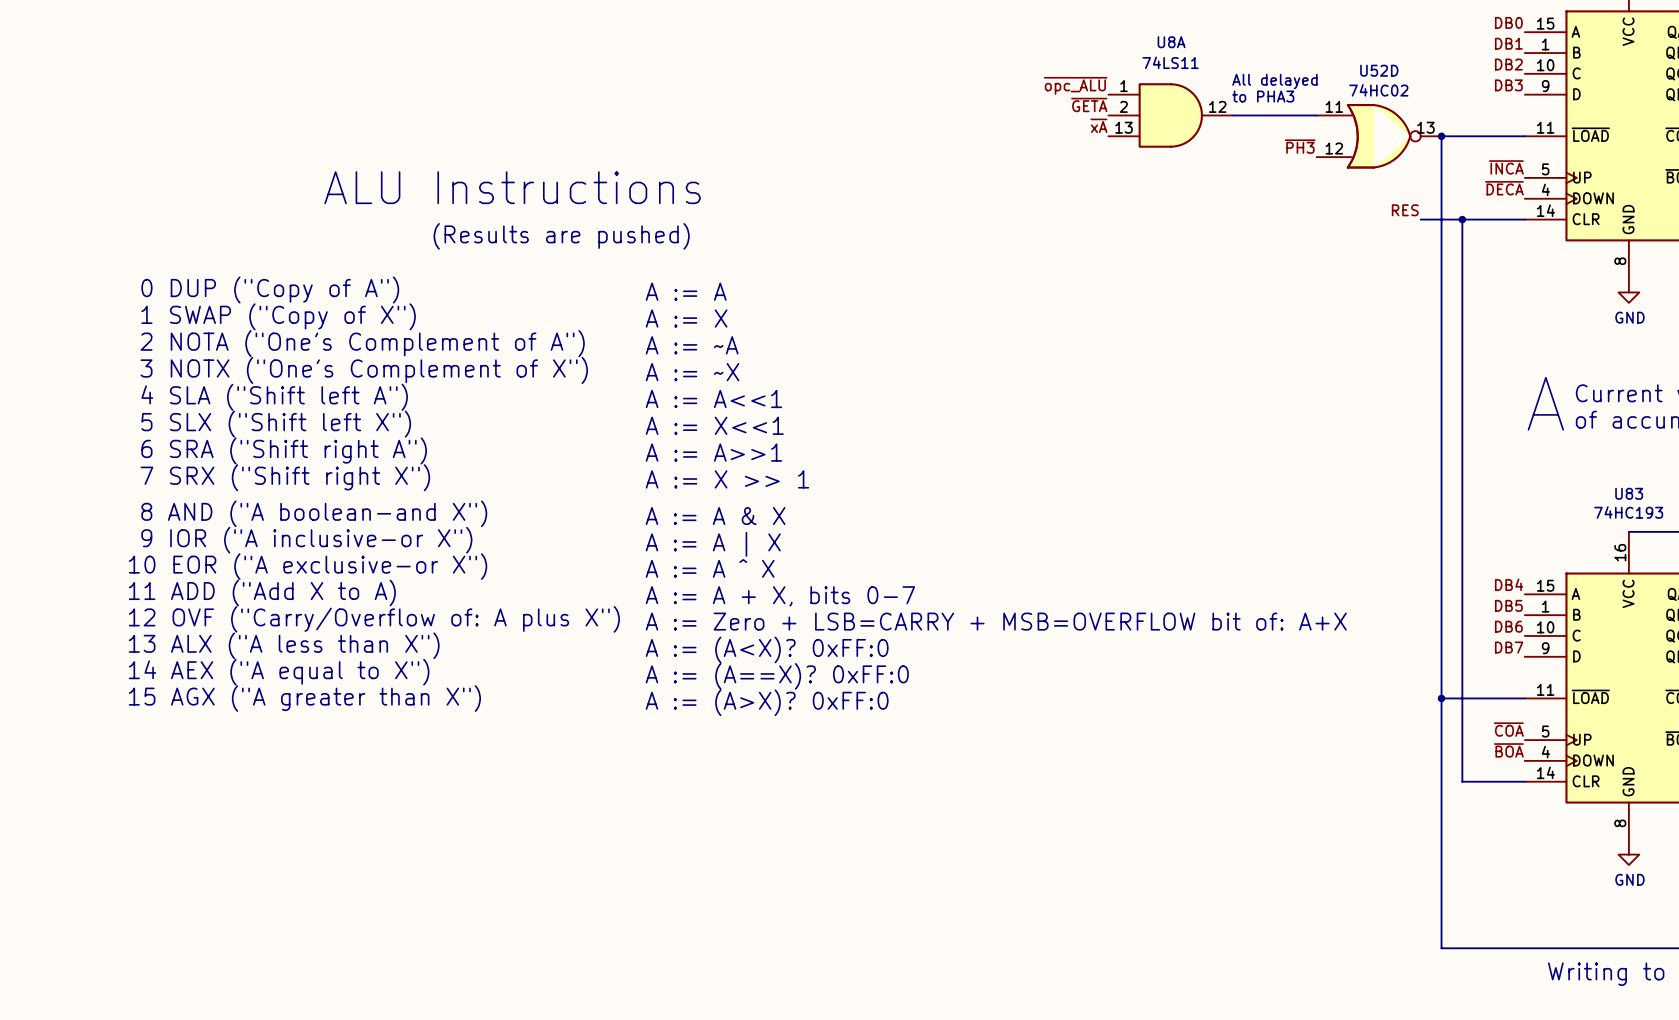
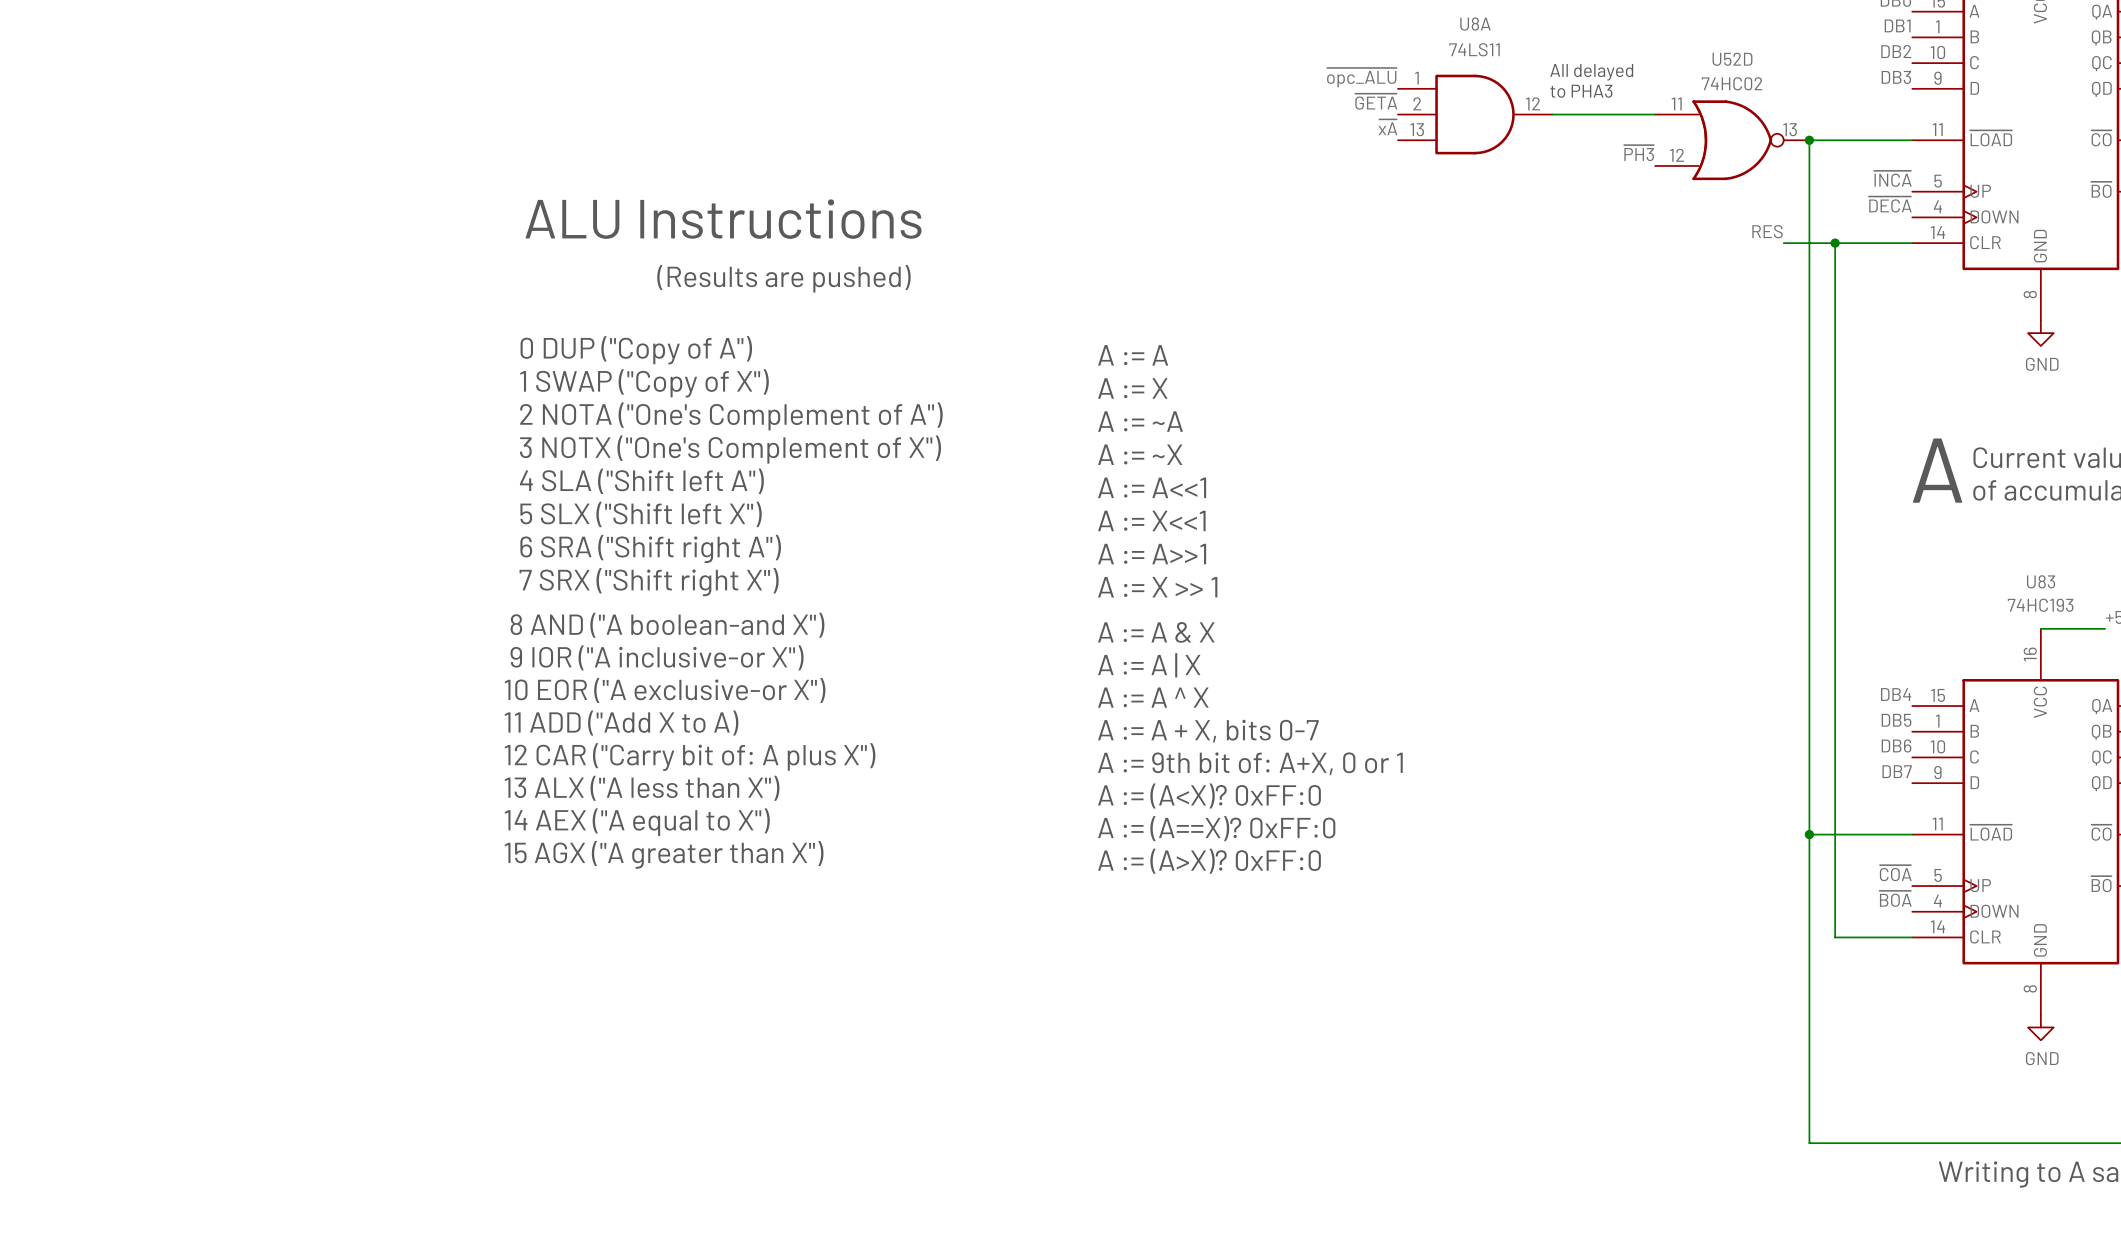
text position: ALU Instructions (512, 187) -> ALU Instructions (723, 219)
text position: (Results are pushed) (561, 236) -> (Results are pushed) (783, 278)
text: 0 DUP ("Copy of A") (270, 290) -> none
text: A := A (686, 291) -> none
text: none -> 0 DUP ("Copy of A") (636, 350)
text: none -> A := A (1133, 355)
text: 1 SWAP ("Copy of X") (278, 316) -> none
text: A := X (686, 318) -> none
text: none -> 1 SWAP ("Copy of X") (644, 383)
text: none -> A := X (1132, 388)
text: 2 NOTA ("One's Complement of A") (362, 343) -> none
text: A := ~A (692, 345) -> none
text: none -> 2 NOTA ("One's Complement of A") (731, 416)
text: none -> A := ~A (1140, 421)
text: 3 NOTX ("One's Complement of X") (364, 370) -> none
text: A := ~X (692, 372) -> none
text: none -> 3 NOTX ("One's Complement of X") (730, 449)
text: none -> A := ~X (1140, 454)
text: 4 SLA ("Shift left A") (274, 397) -> none
text: A := A<<1 (713, 398) -> none
text: none -> 4 SLA ("Shift left A") (641, 481)
text: none -> A := A<<1 (1152, 487)
text: 5 SLX ("Shift left X") (276, 424) -> none
text: A := X<<1 (714, 425) -> none
text: none -> 5 SLX ("Shift left X") (641, 514)
text: none -> A := X<<1 (1151, 520)
text: 6 SRA ("Shift right A") (284, 450) -> none
text: A := A>>1 (713, 452) -> none
text: none -> 6 SRA ("Shift right A") (650, 548)
text: none -> A := A>>1 (1152, 554)
text: 7 SRX ("Shift right X") (285, 477) -> none
text: A := X >> 1 (727, 479) -> none
text: none -> 7 SRX ("Shift right X") (649, 582)
text: none -> A := X >> 1 (1157, 587)
text: 8 AND ("A boolean-and X") (314, 513) -> none
text: A := A & X (715, 516) -> none
text: none -> 8 AND ("A boolean-and X") (667, 625)
text: none -> A := A & X (1156, 632)
text: 9 IOR ("A inclusive-or X") (306, 540) -> none
text: A := A | X (713, 544) -> none
text: none -> 9 IOR ("A inclusive-or X") (657, 657)
text: none -> A := A | X (1149, 665)
text: 10 EOR ("A exclusive-or X") (308, 566) -> none
text: A := A ^ X (710, 568) -> none
text: none -> 10 EOR ("A exclusive-or X") (665, 690)
text: none -> A := A ^ X (1153, 697)
text: 11 ADD ("Add X to A) (262, 592) -> none
text: A := A + X, bits 0-7 (780, 596) -> none
text: none -> 11 ADD ("Add X to A) (621, 723)
text: none -> A := A + X, bits 0-7 (1208, 731)
text: 12 OVF ("Carry/Overflow of: A plus X") (374, 619) -> none
text: A := Zero + LSB=CARRY + MSB=OVERFLOW bit of: A+X (996, 621) -> none
text: none -> 12 CAR ("Carry bit of: A plus X") (690, 757)
text: none -> A := 9th bit of: A+X, 0 or 1 (1250, 763)
text: 13 ALX ("A less than X") (284, 645) -> none
text: A := (A<X)? 0xFF:0 (767, 649) -> none
text: none -> 13 ALX ("A less than X") (642, 788)
text: none -> A := (A<X)? 0xFF:0 (1209, 795)
text: 14 AEX ("A equal to X") (279, 672) -> none
text: A := (A==X)? 0xFF:0 (777, 676) -> none
text: none -> 14 AEX ("A equal to X") (637, 822)
text: none -> A := (A==X)? 0xFF:0 (1216, 828)
text: 15 AGX ("A greater than X") (304, 698) -> none
text: A := (A>X)? 0xFF:0 (767, 702) -> none
text: none -> 15 AGX ("A greater than X") (664, 854)
text: none -> A := (A>X)? 0xFF:0 (1209, 861)

